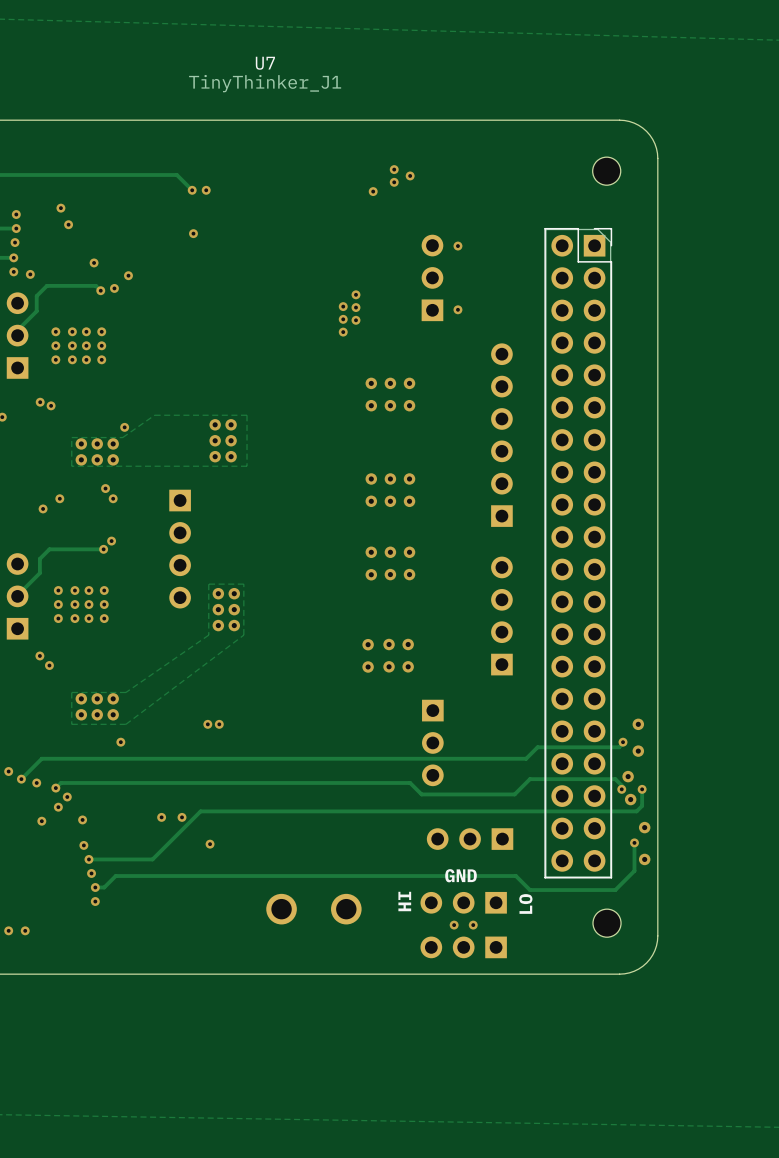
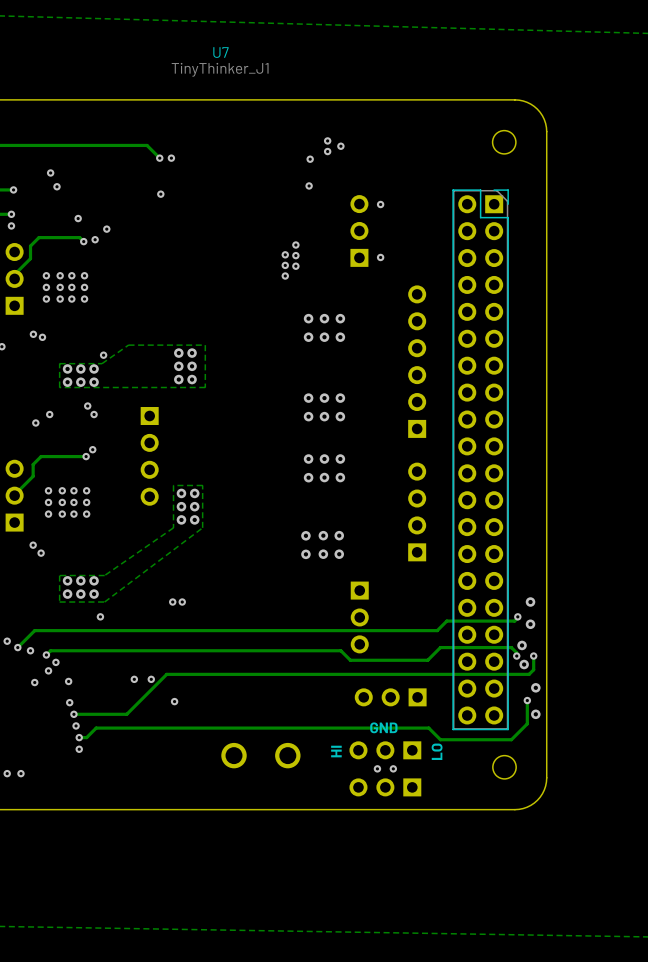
via: (16, 214) -> none
via: none -> (309, 185)
via: (15, 242) -> none
via: (30, 274) -> none

